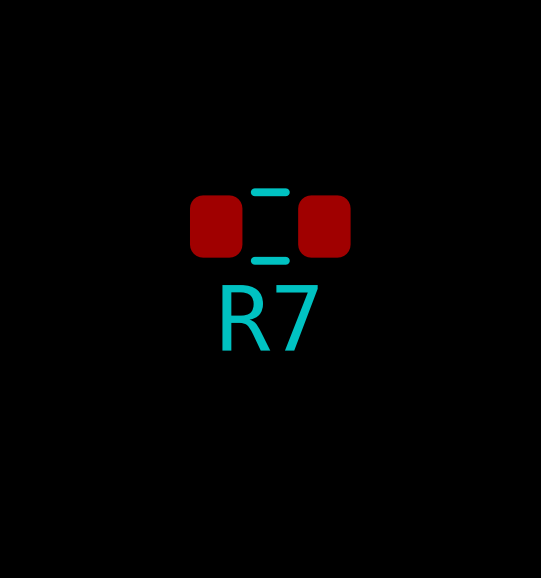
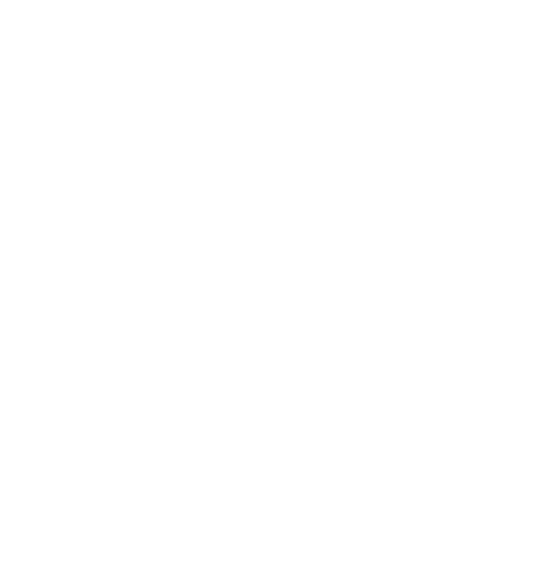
R7: (270, 226) -> none

